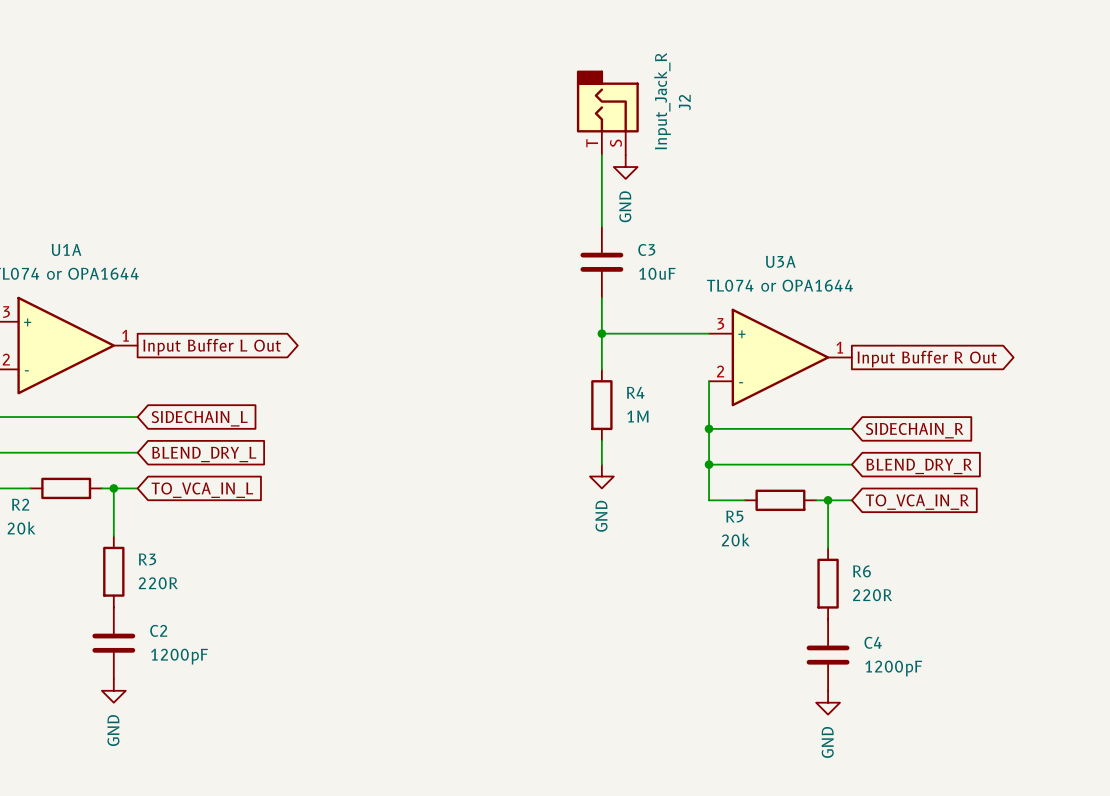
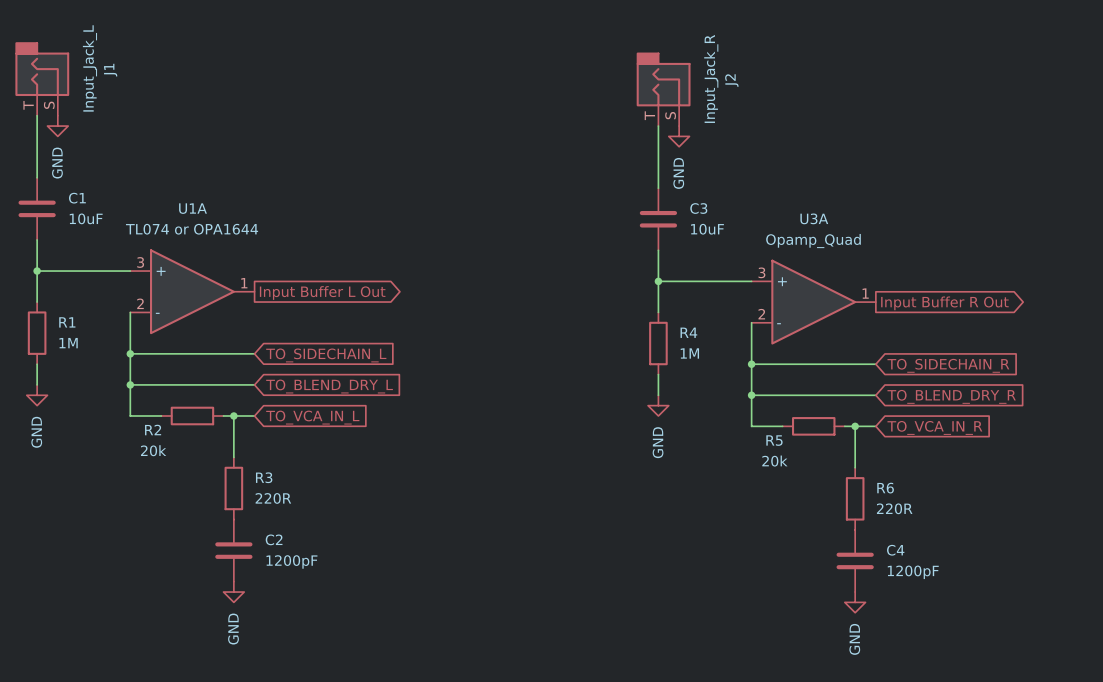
U3A value: TL074 or OPA1644 (779, 285) -> Opamp_Quad (813, 241)
global label: SIDECHAIN_L (199, 418) -> TO_SIDECHAIN_L (326, 355)
global label: SIDECHAIN_R (914, 430) -> TO_SIDECHAIN_R (948, 365)
global label: BLEND_DRY_L (204, 454) -> TO_BLEND_DRY_L (329, 386)
global label: BLEND_DRY_R (919, 466) -> TO_BLEND_DRY_R (951, 396)

